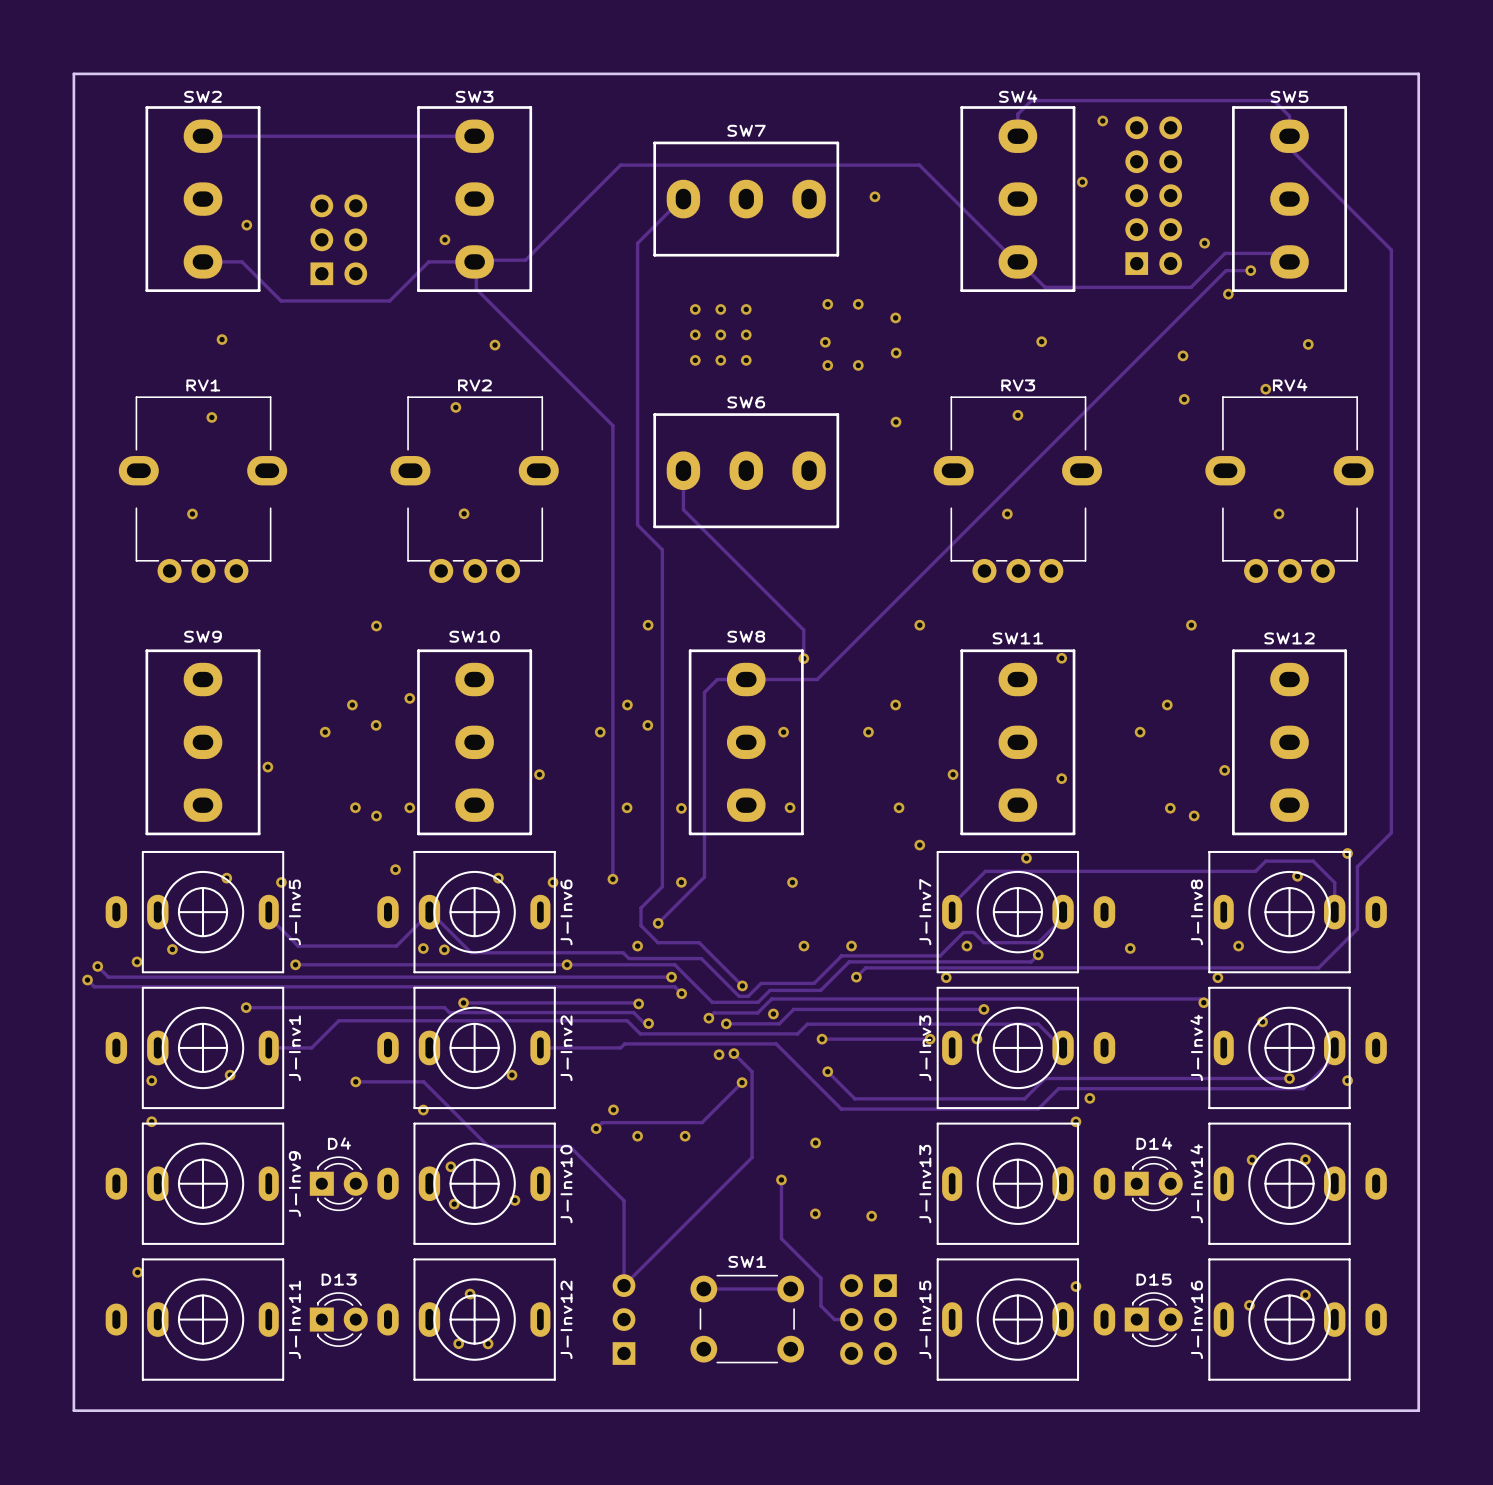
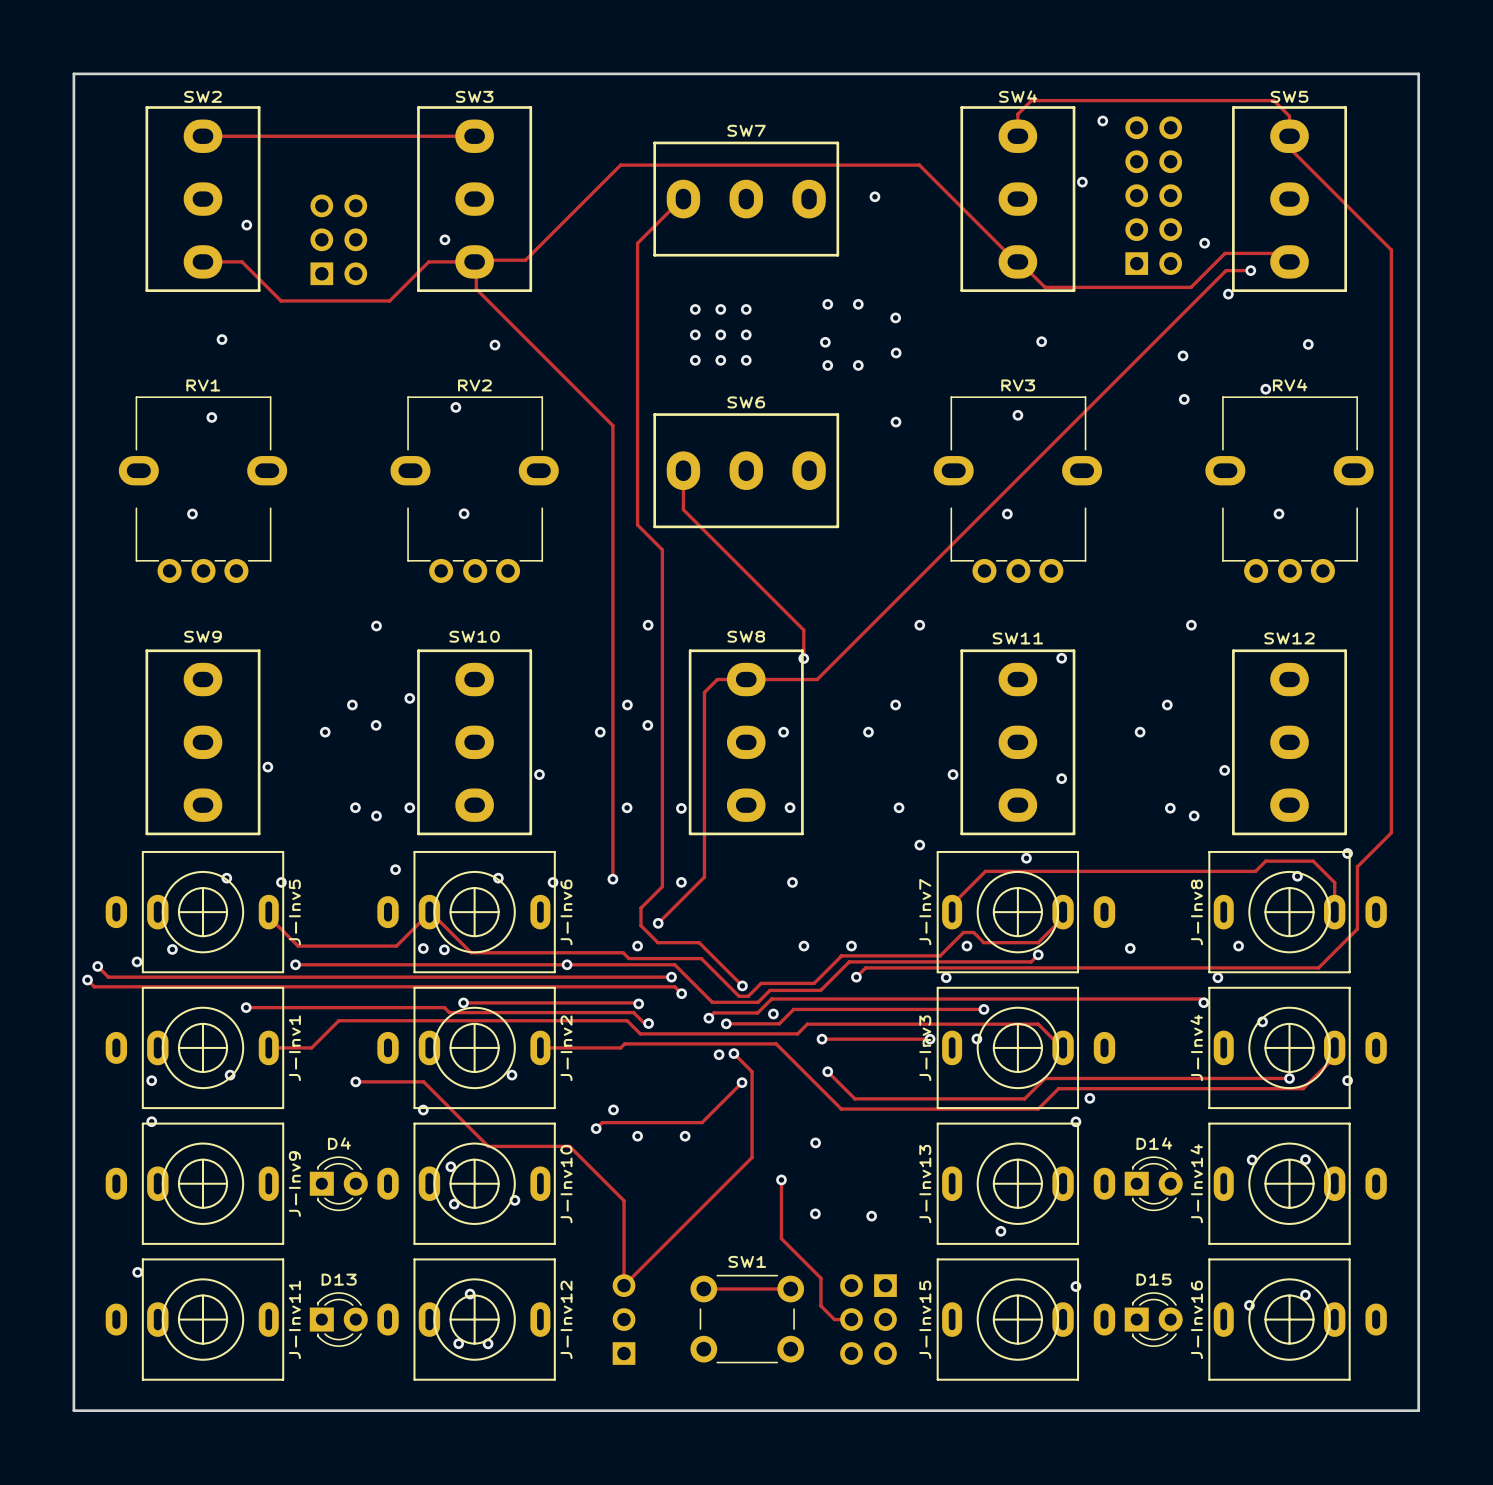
via: none -> (1000, 1231)

